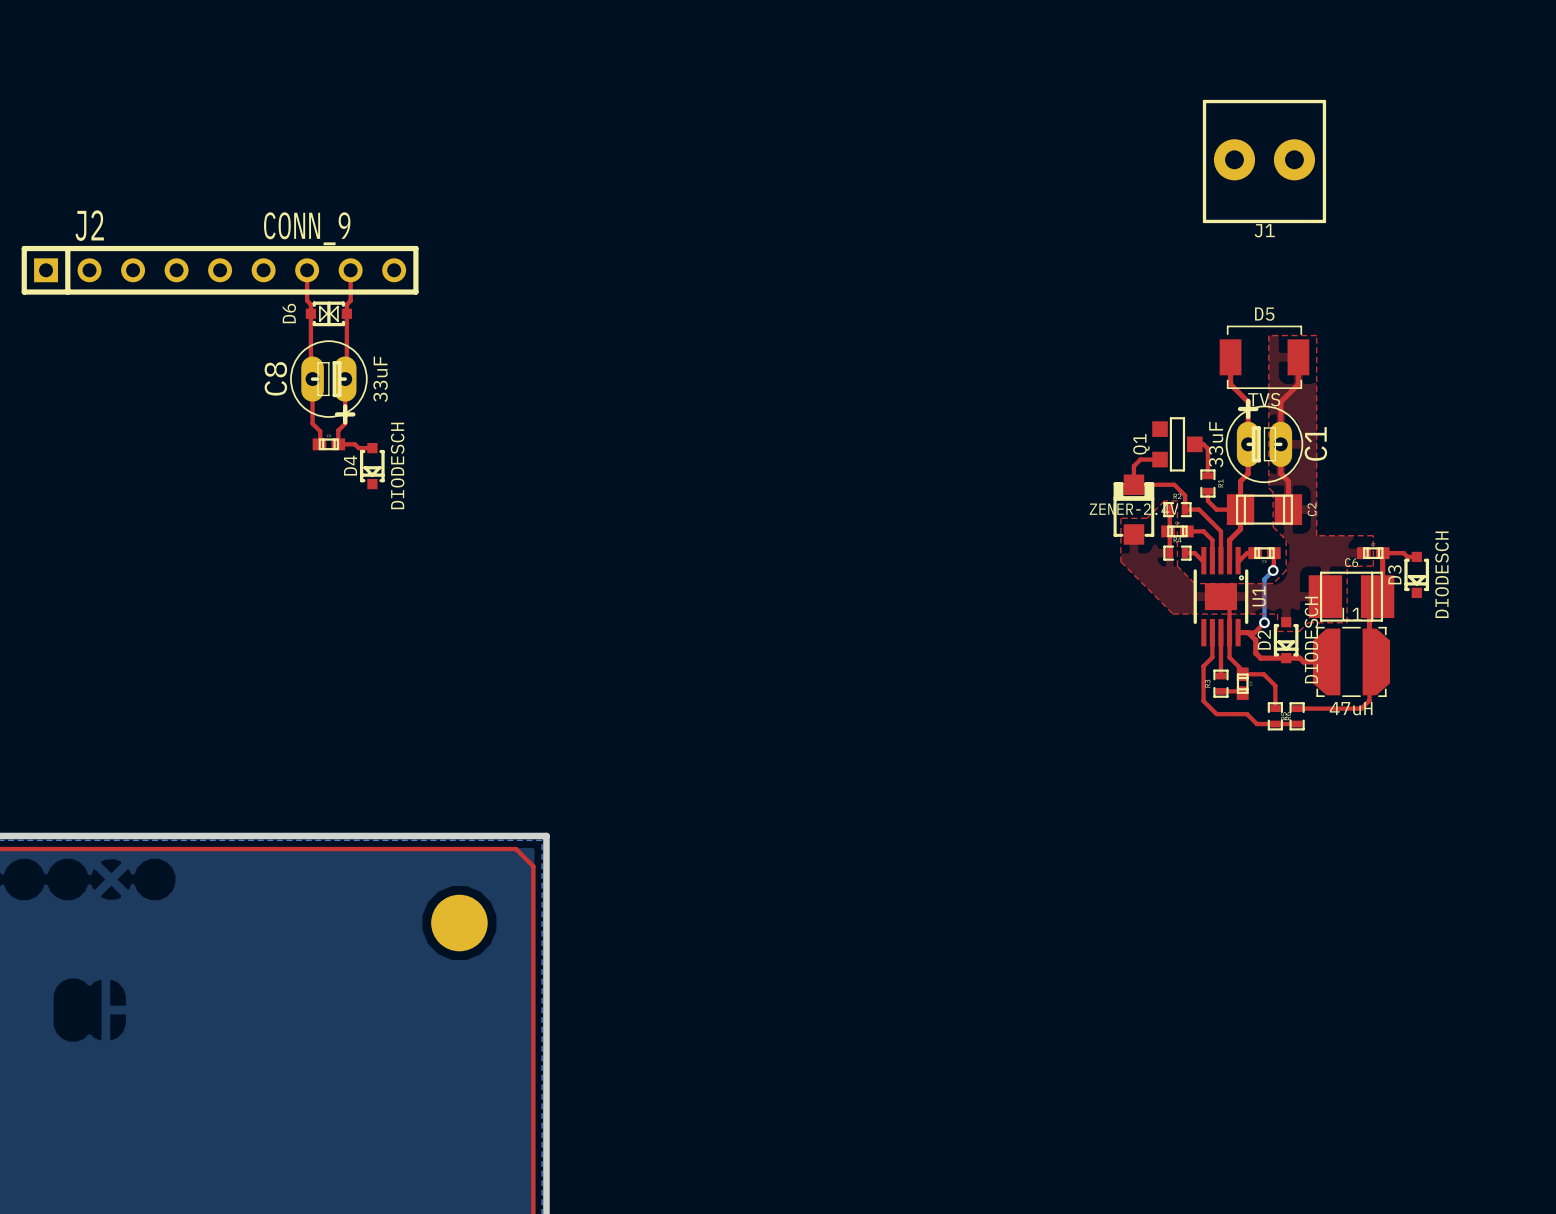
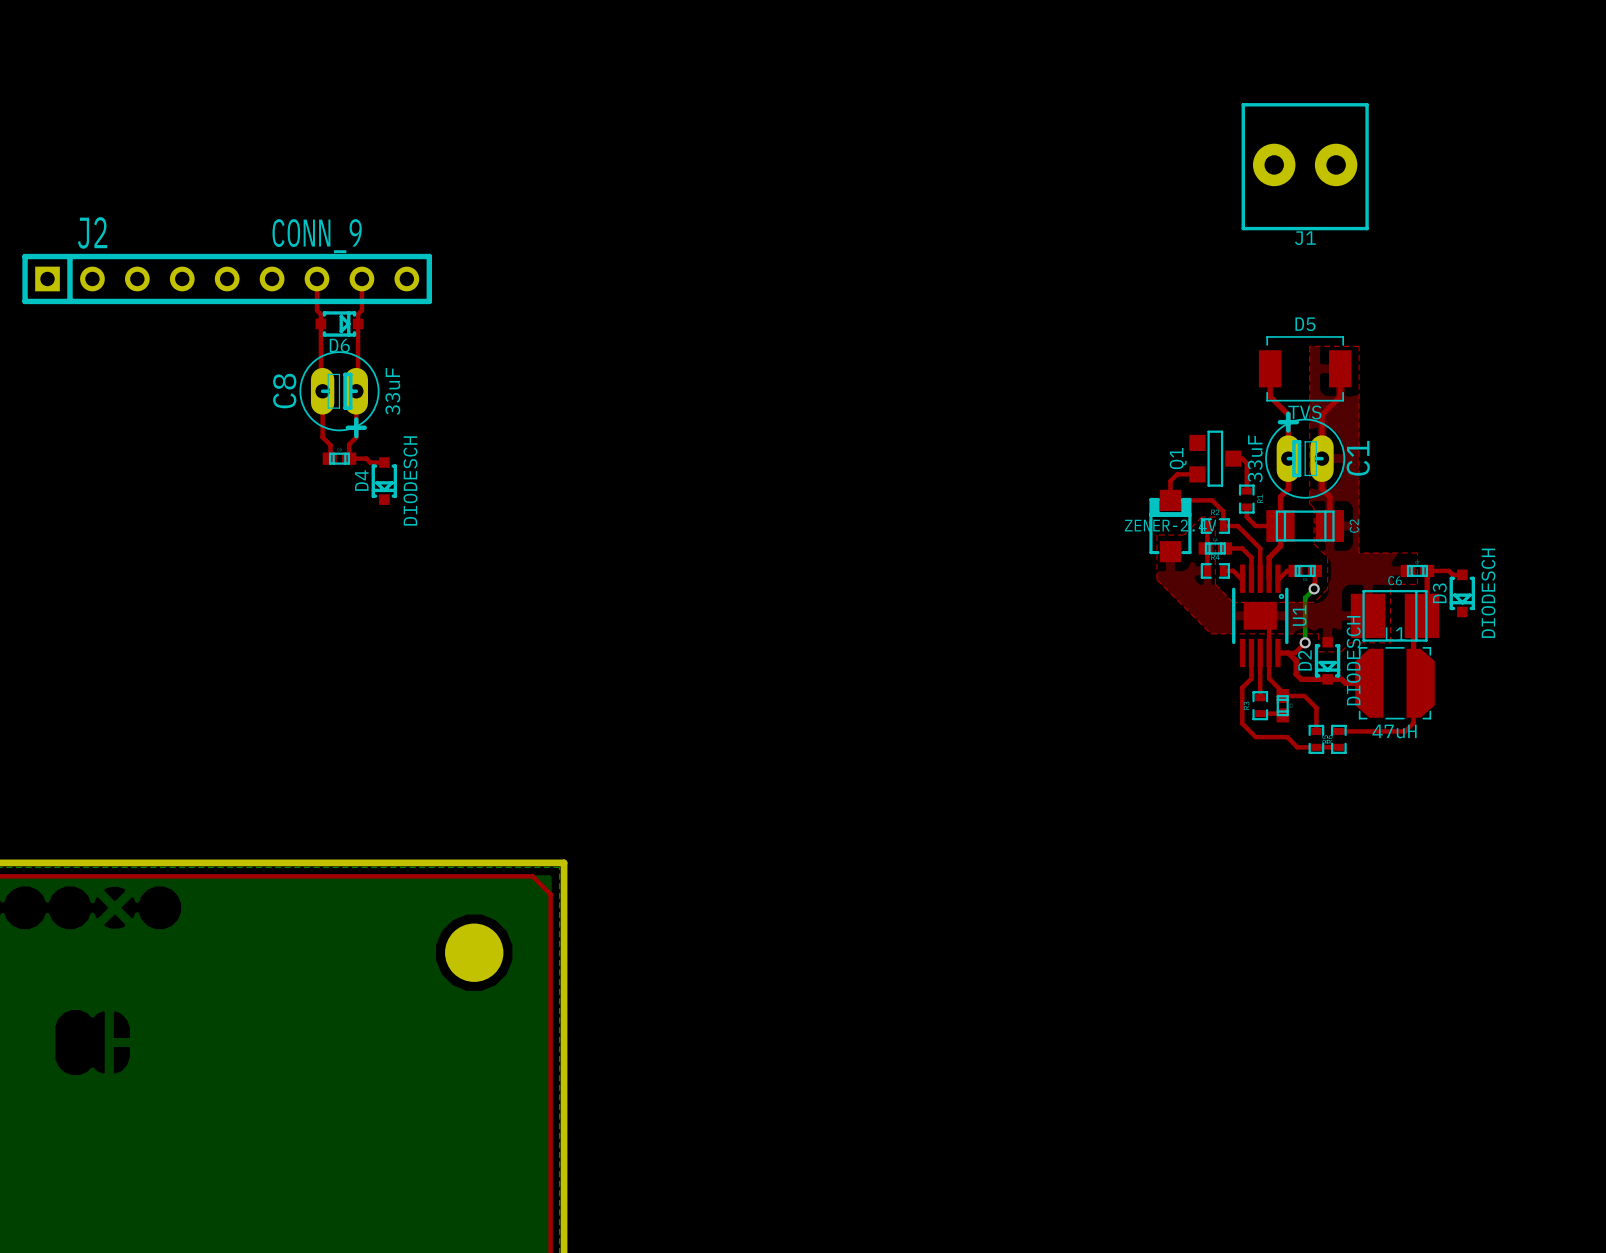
D6 footprint: [305, 301, 352, 327] -> [315, 311, 364, 337]
D6 name rotation: 0° (289, 313) -> 90° clockwise (339, 345)
D6 name position: D6 (289, 313) -> D6 (339, 345)

